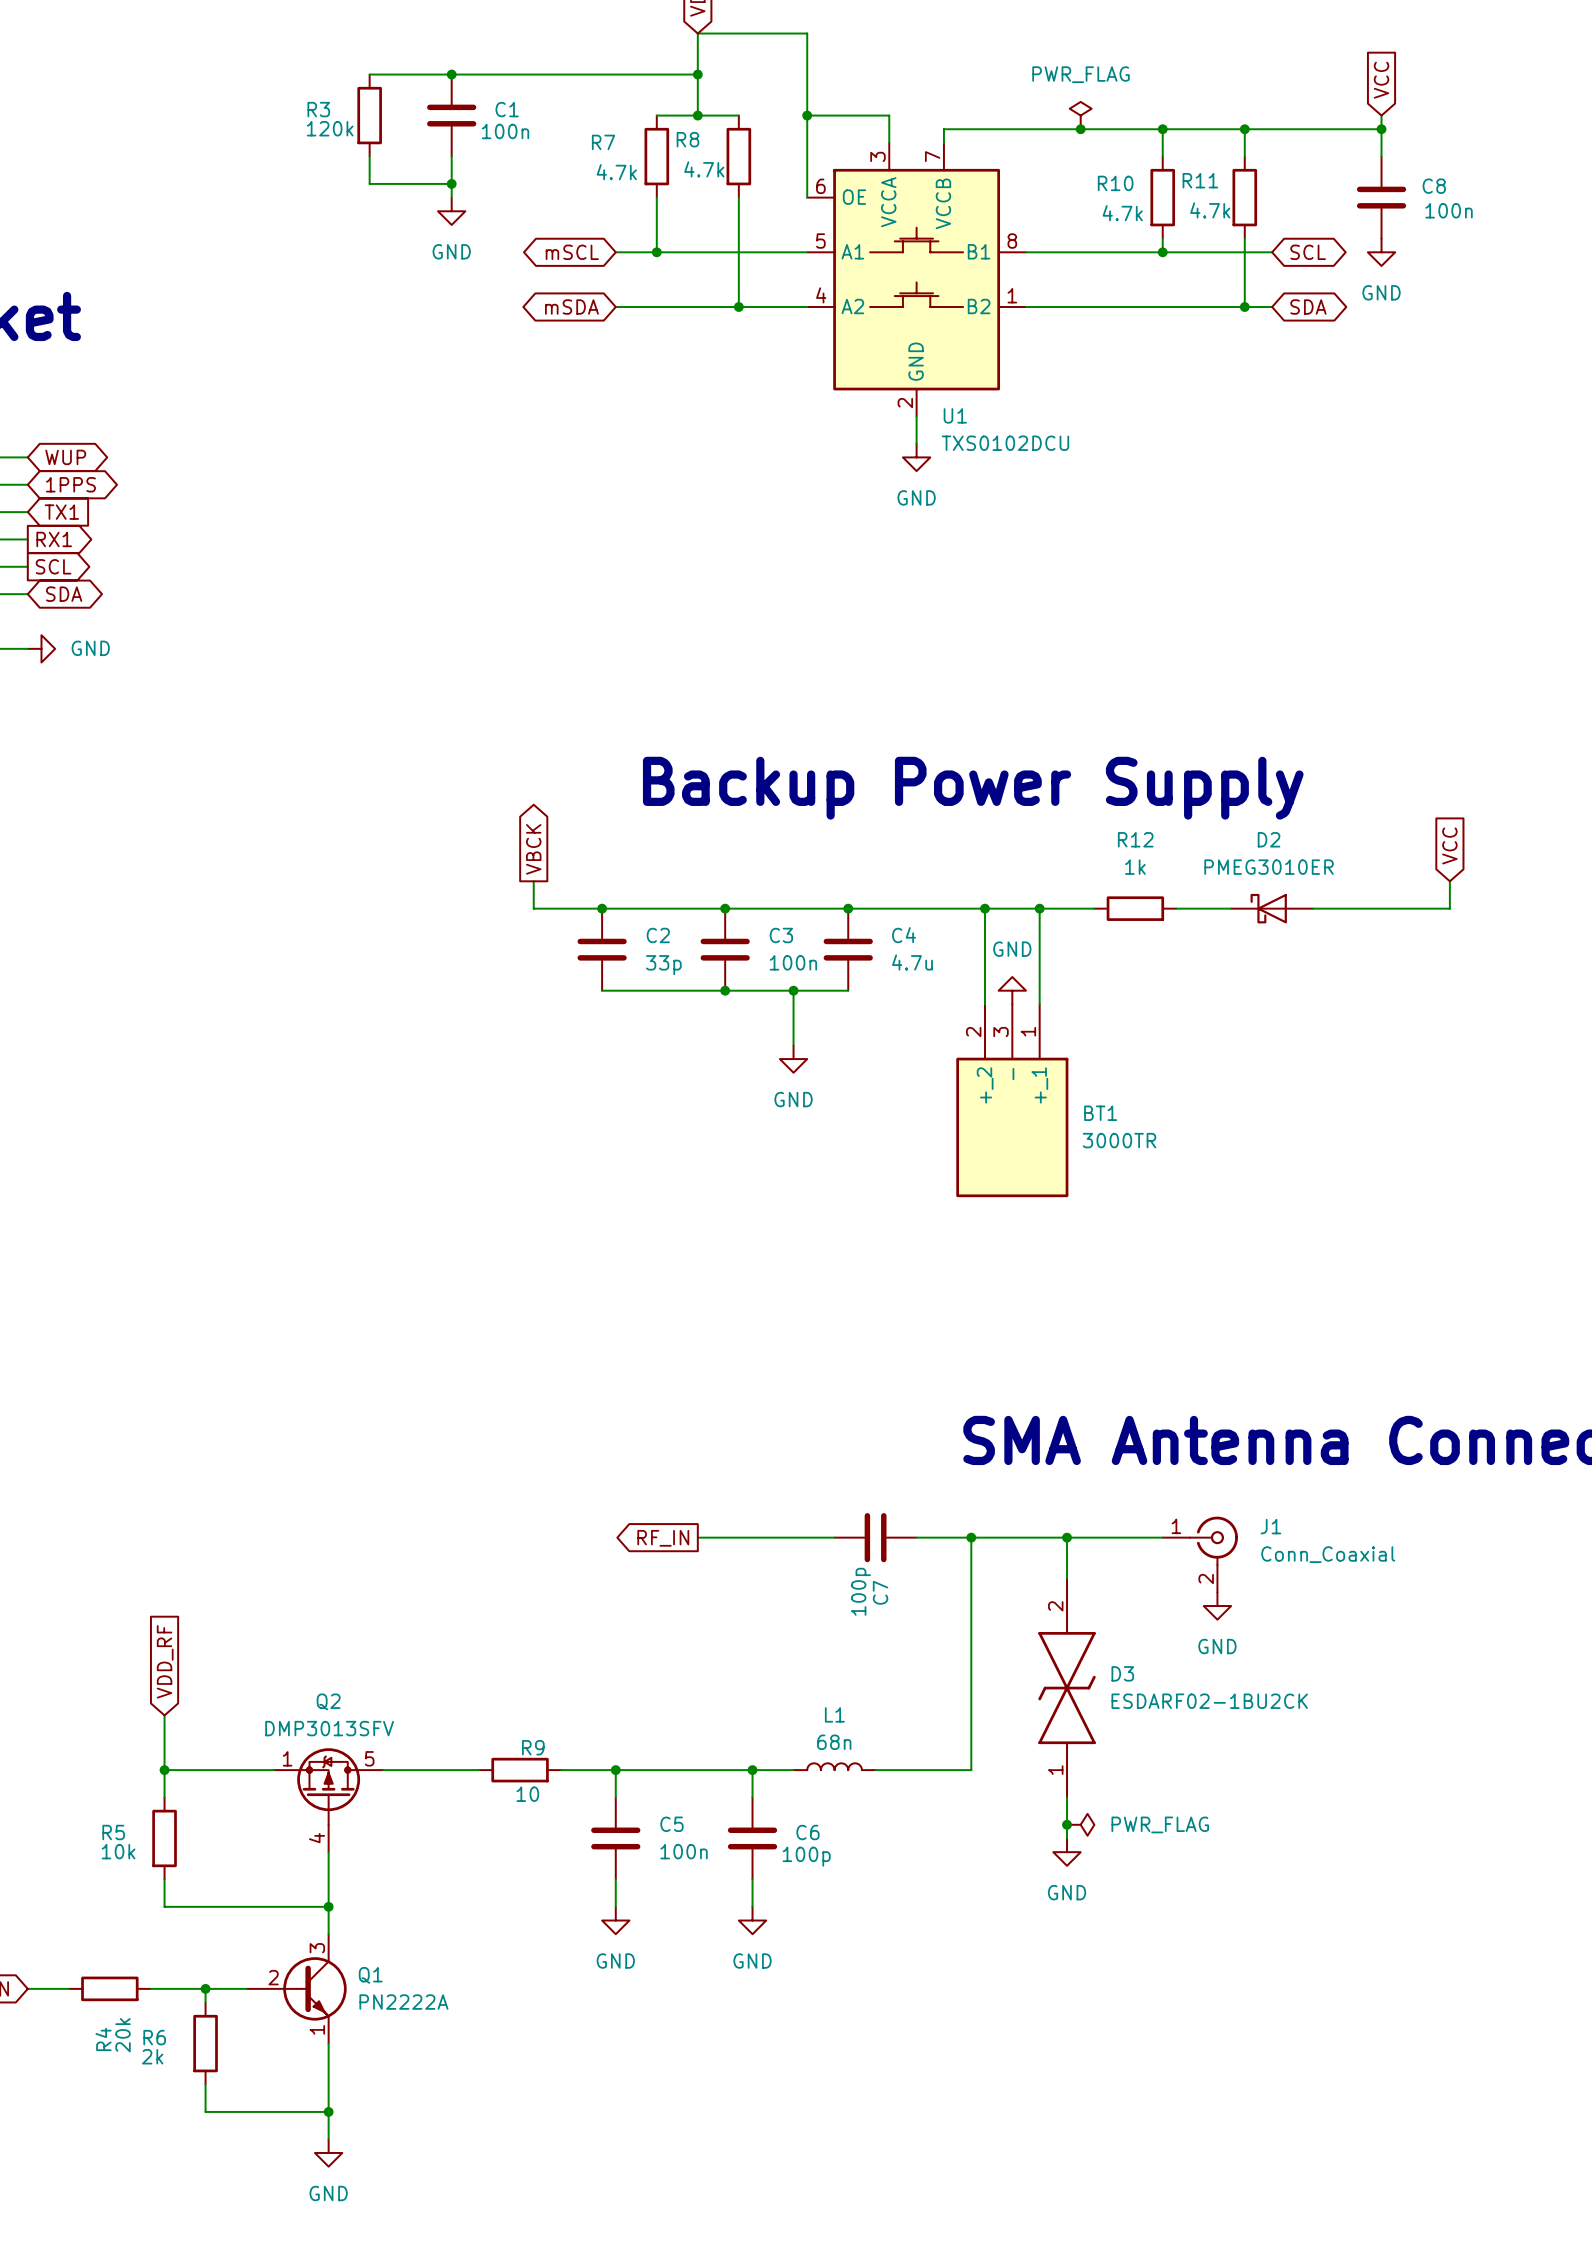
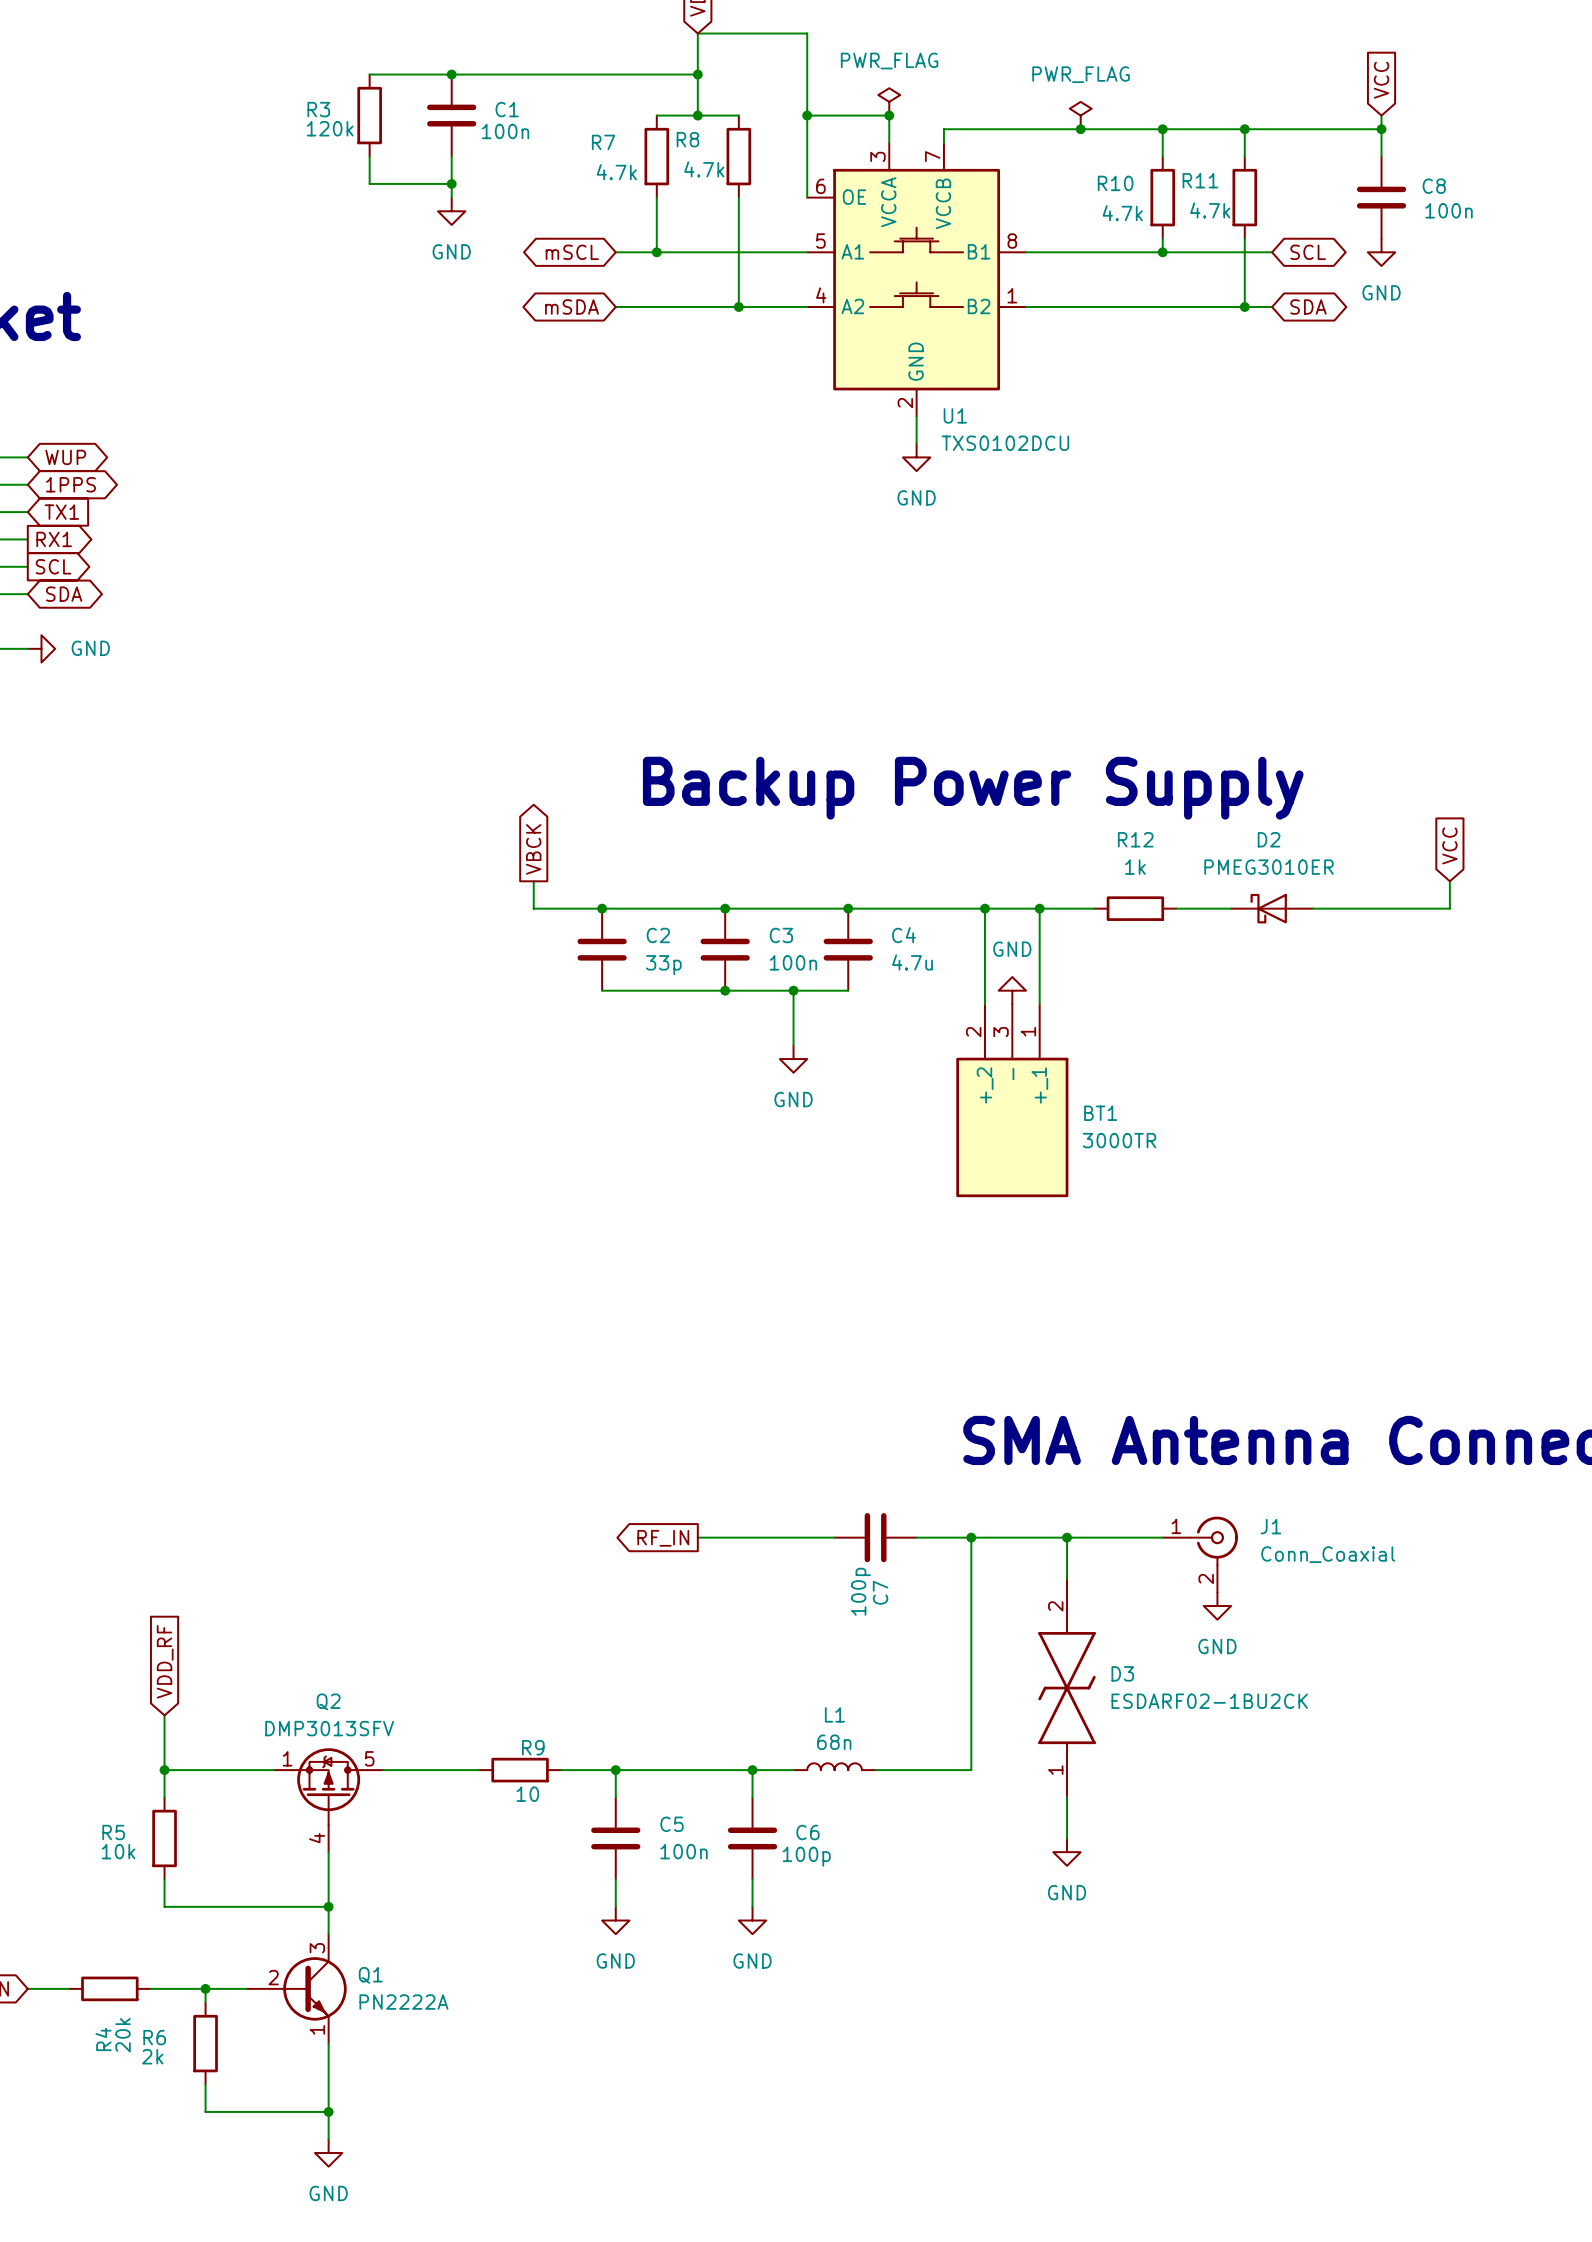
power symbol: none -> PWR_FLAG (889, 101)
junction: none -> (889, 115)
junction: (1067, 1824) -> none
power symbol: PWR_FLAG (1080, 1824) -> none

